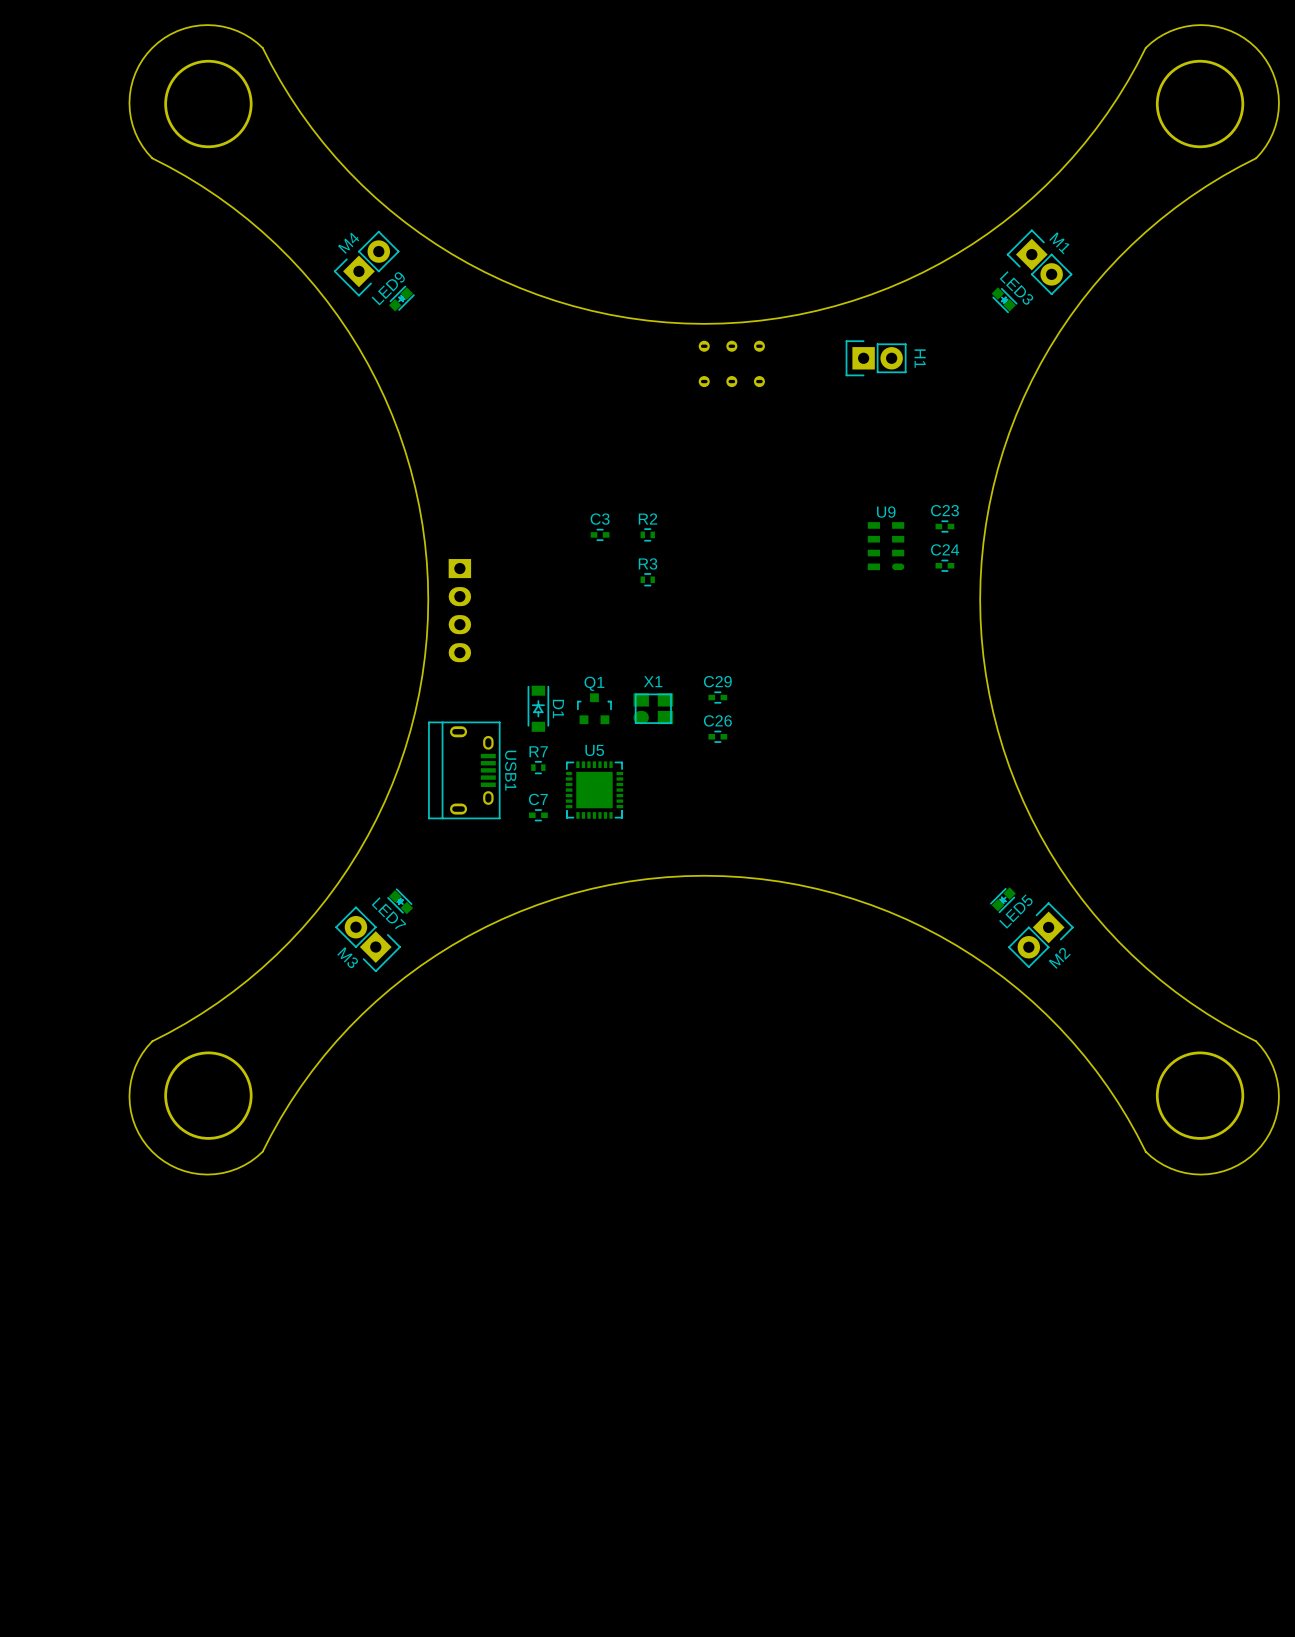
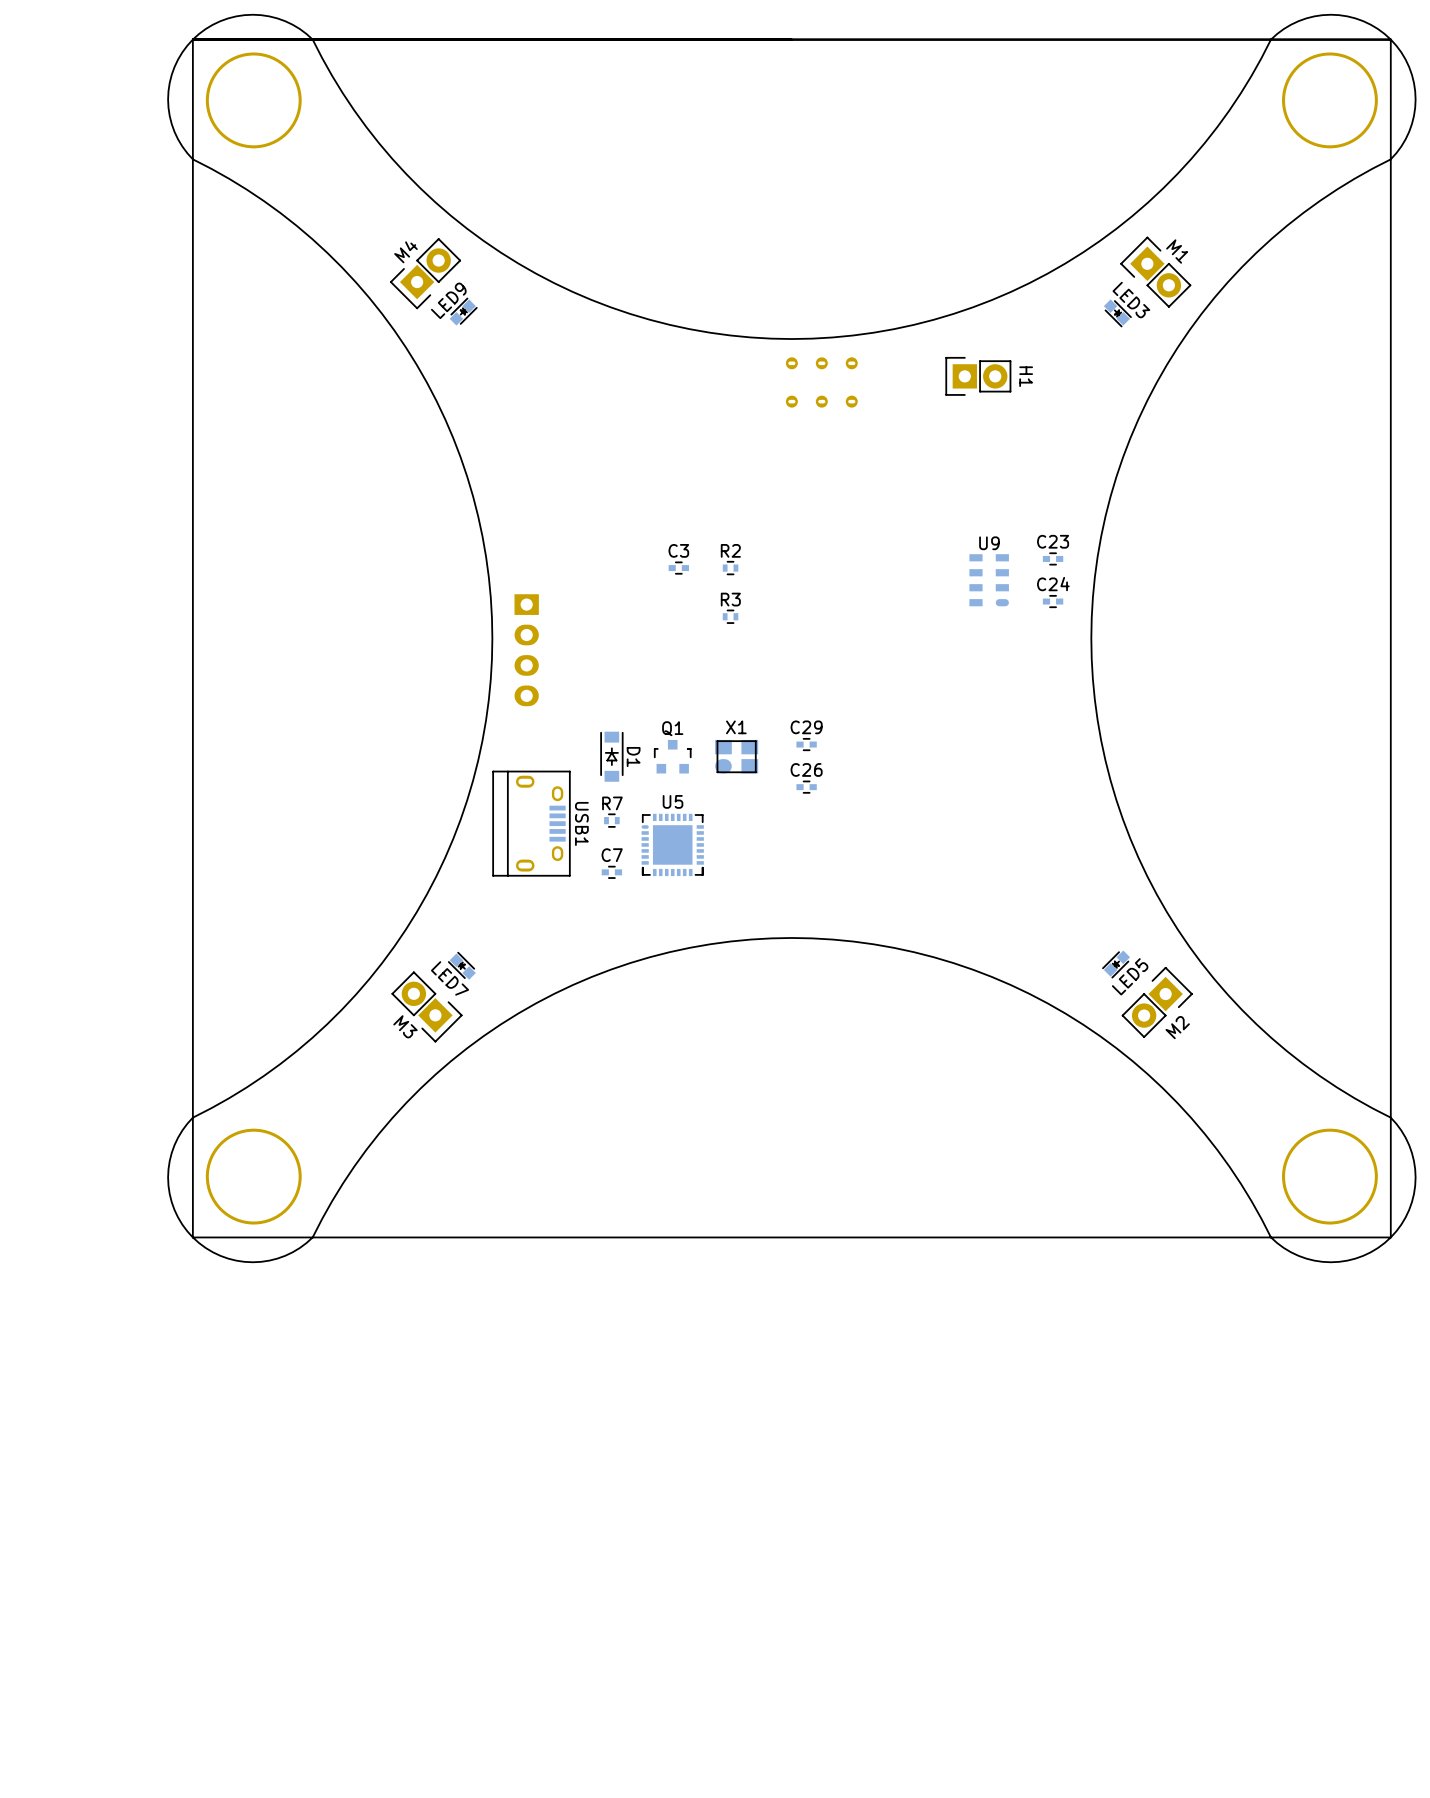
board edge: none -> (1390, 39) (192, 39) (192, 1237) (1390, 1237) (1390, 39)

